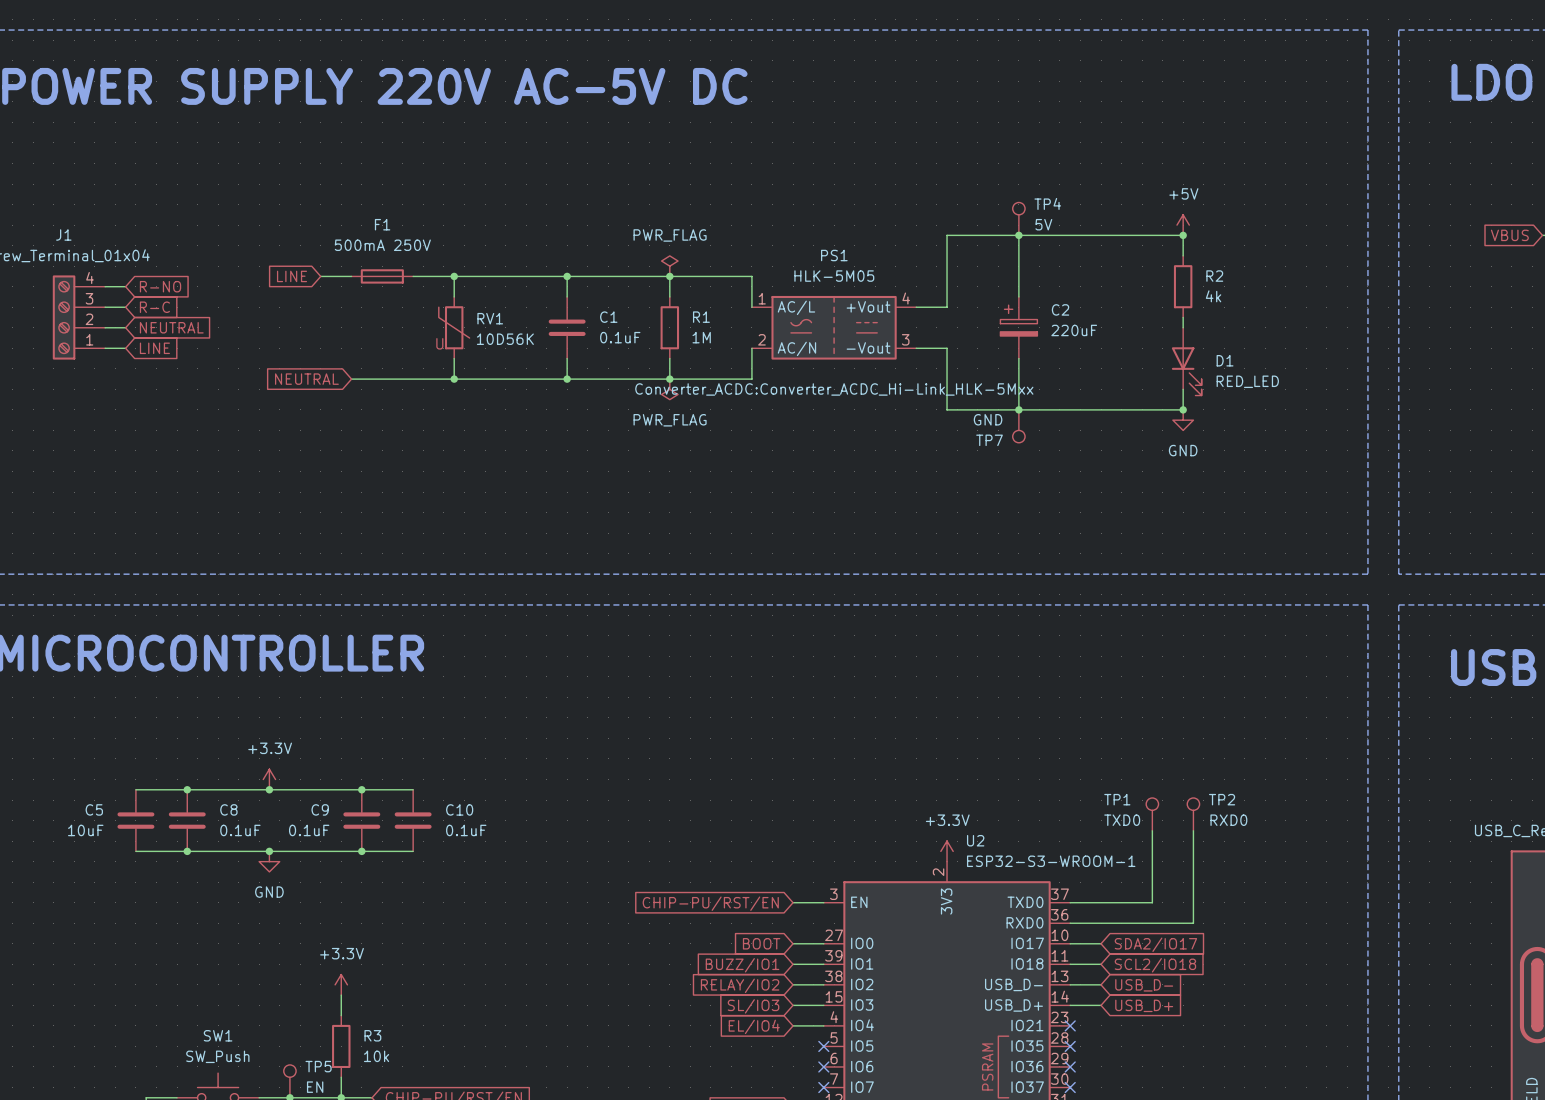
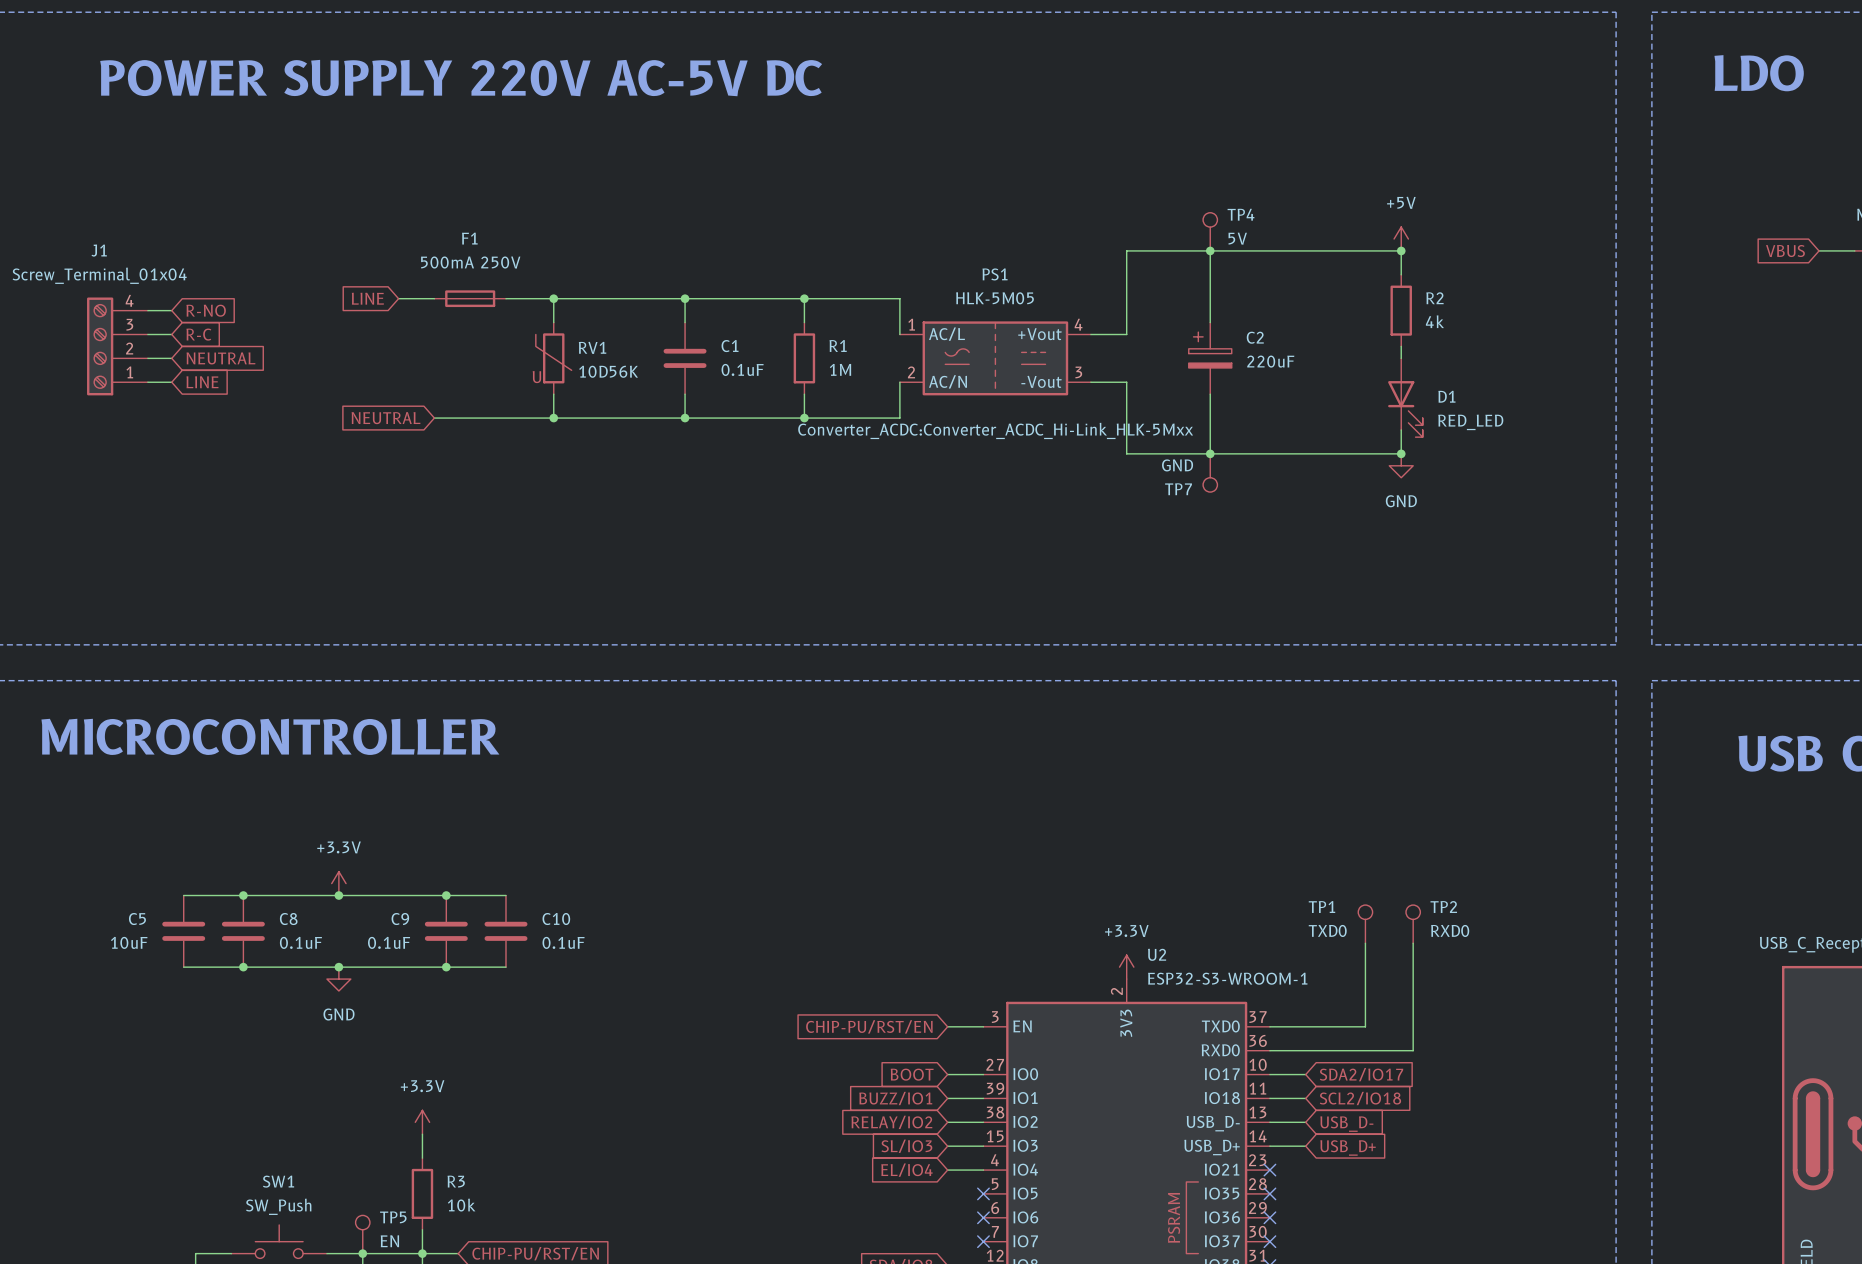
power symbol: PWR_FLAG (669, 266) -> none
power symbol: PWR_FLAG (669, 389) -> none

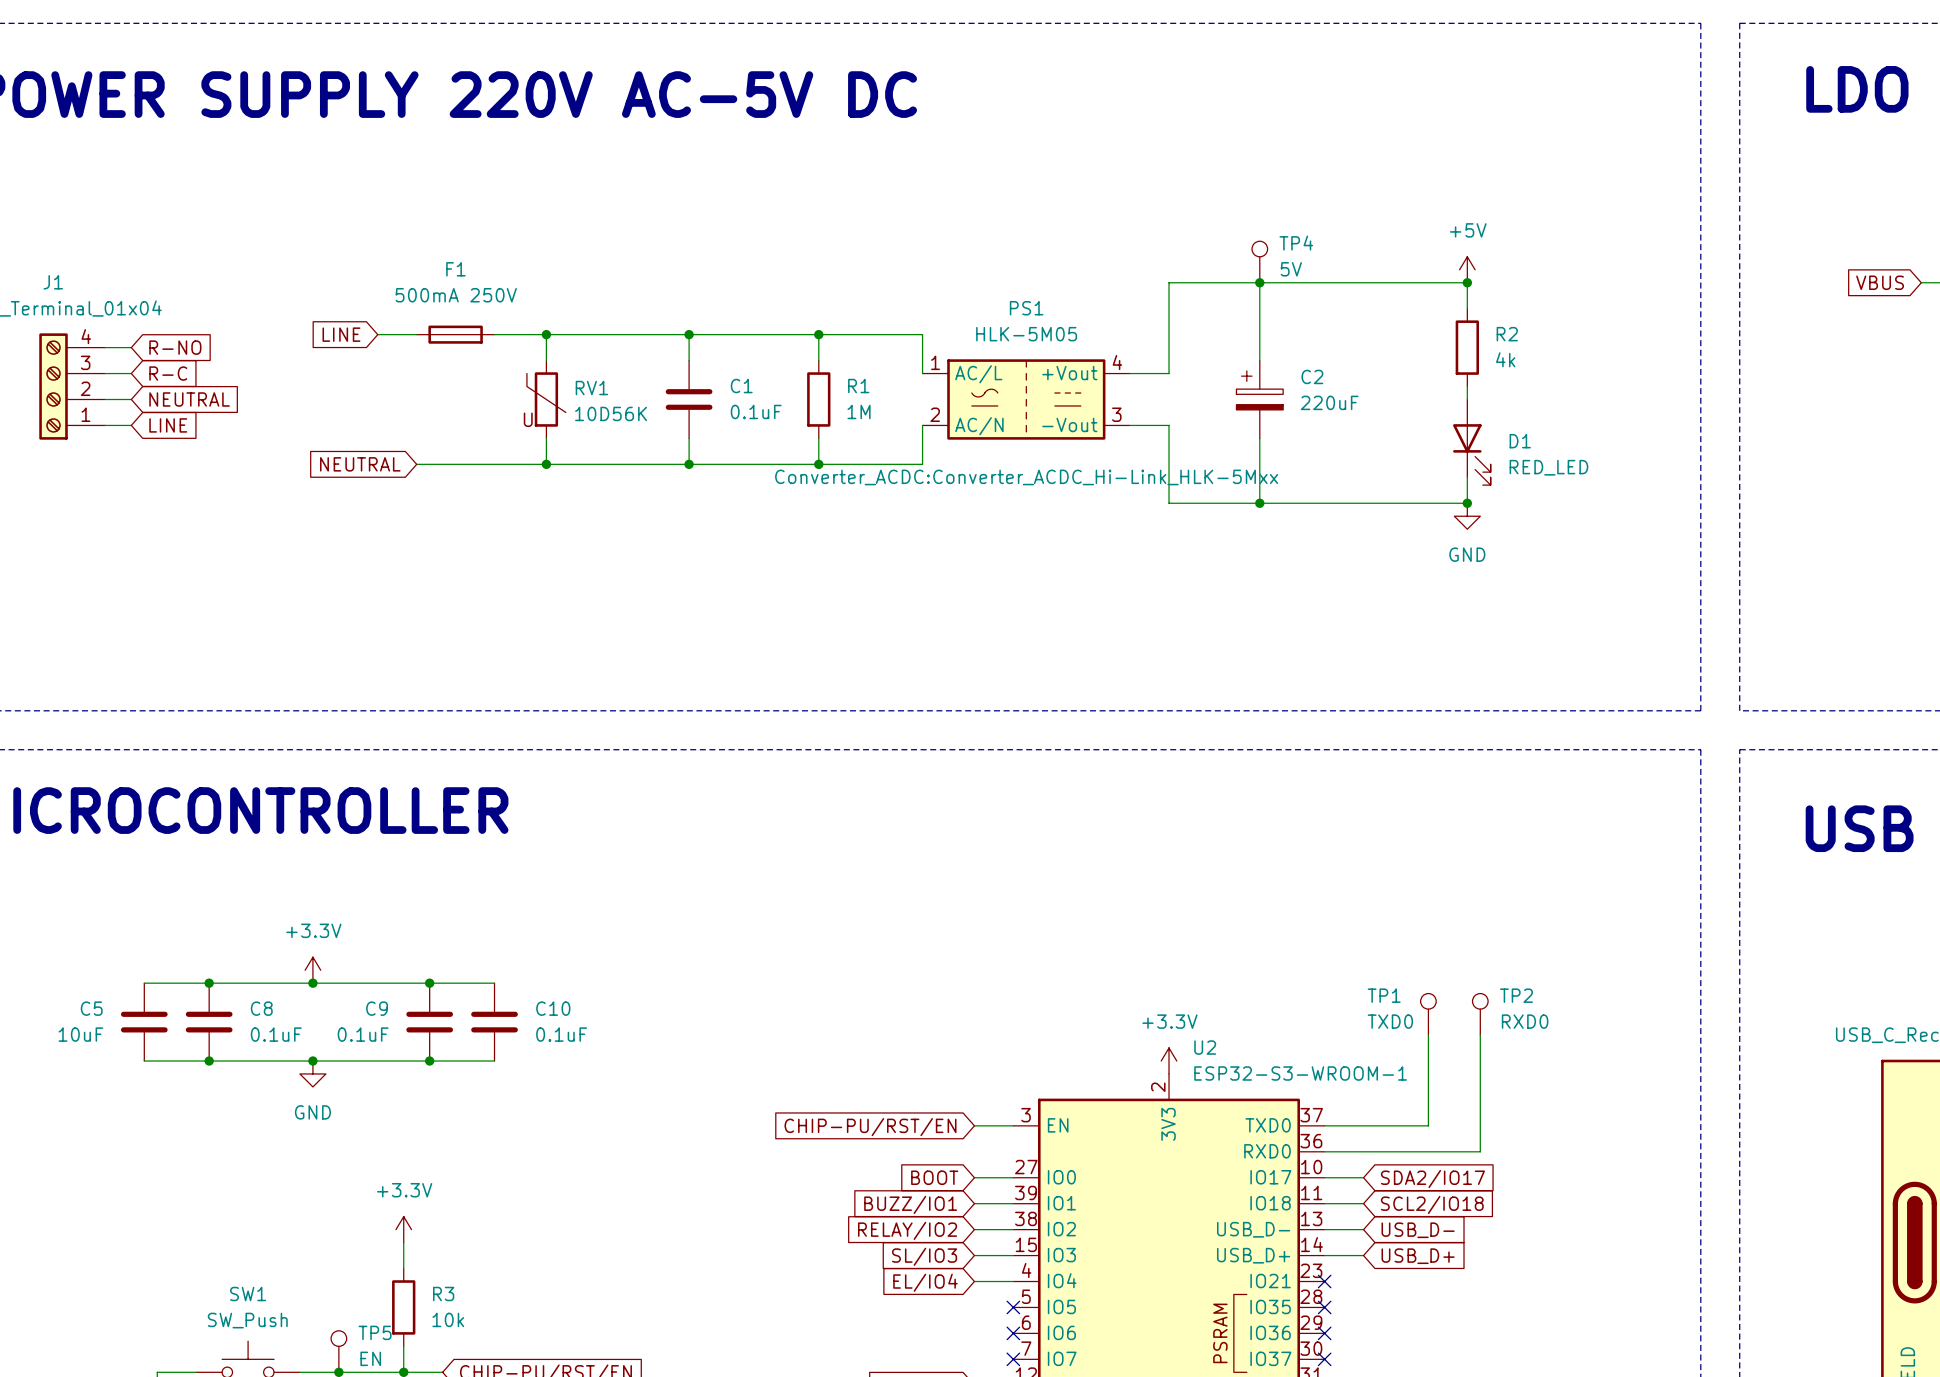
TP7: GND (1210, 472) -> none

